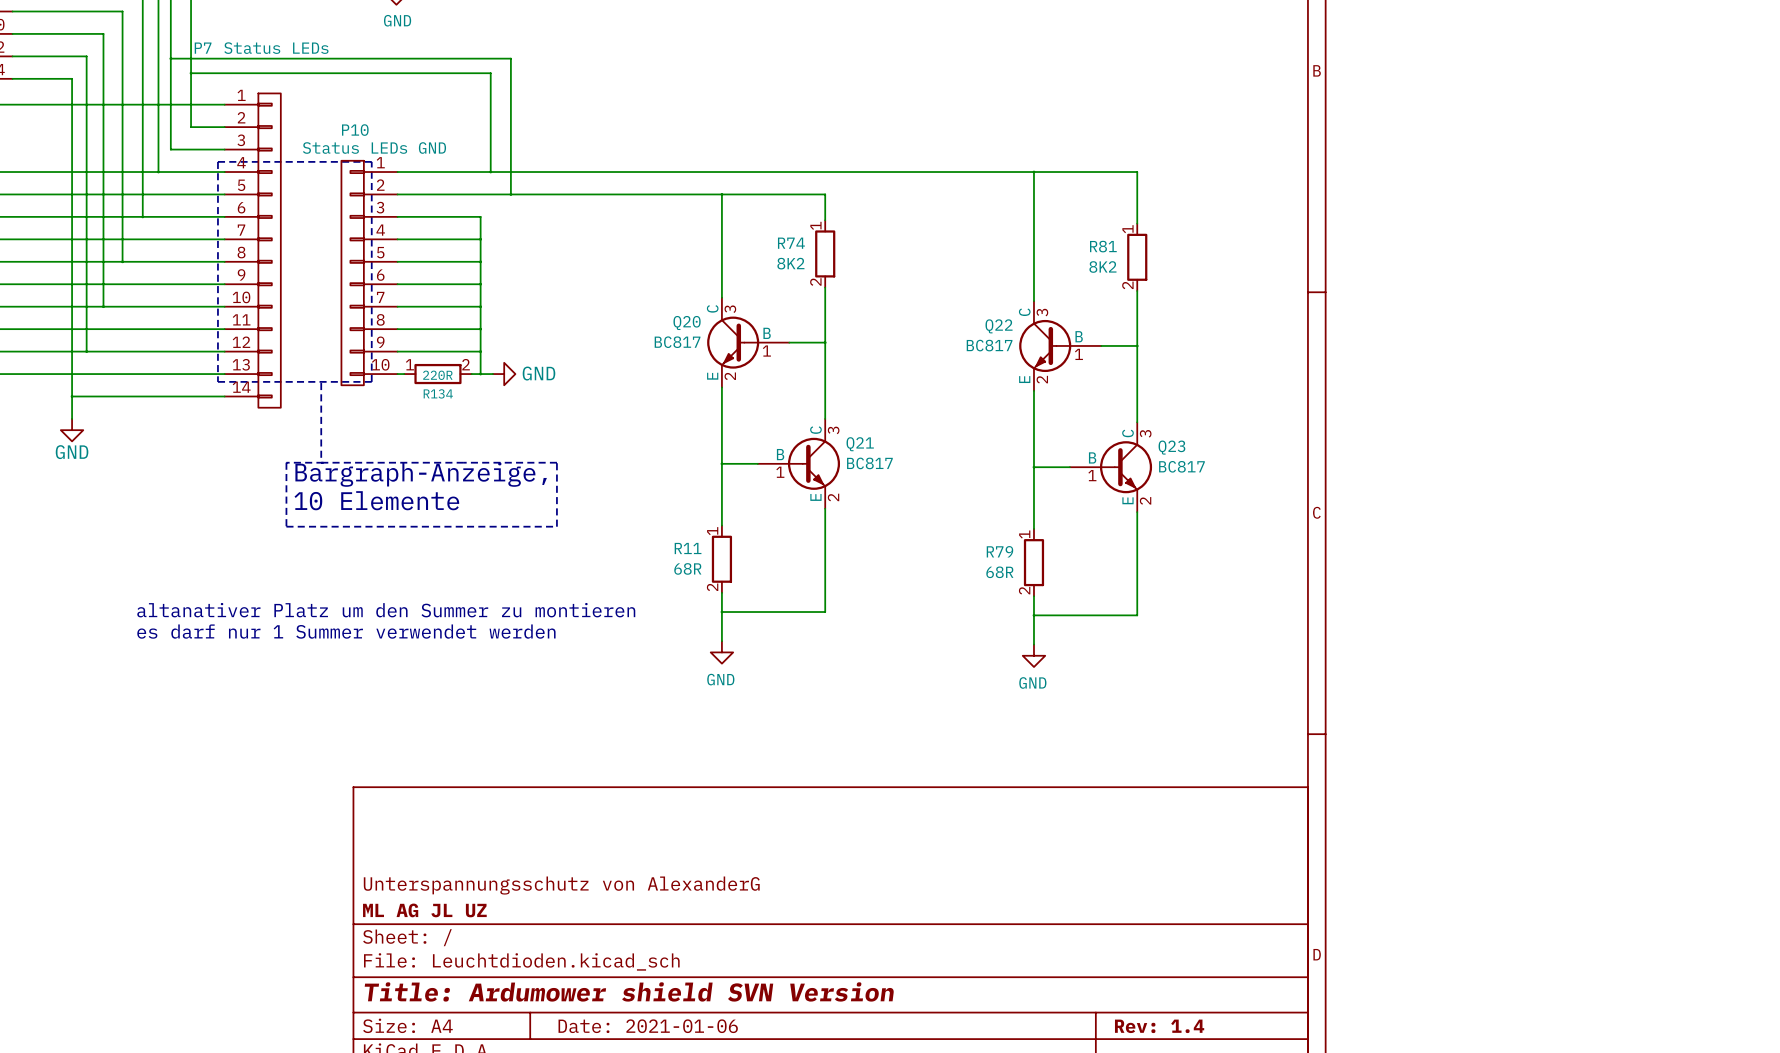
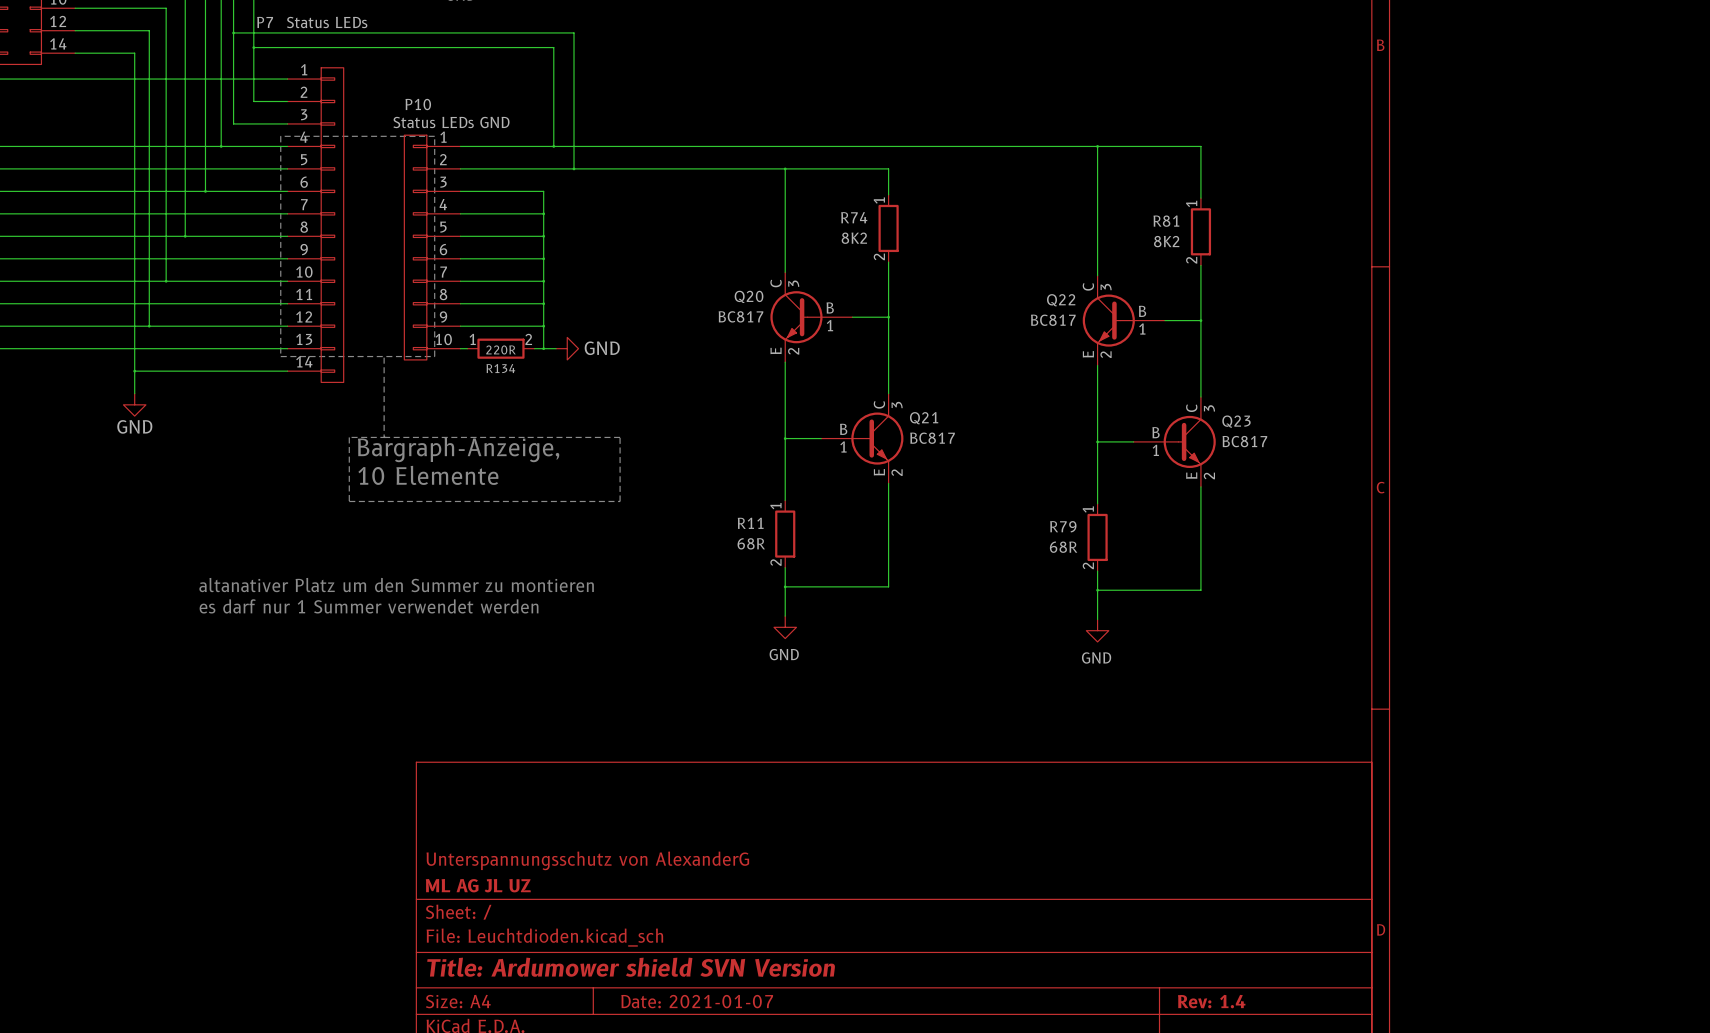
title block: Date: 2021-01-06 (648, 1026) -> Date: 2021-01-07 (697, 1001)

